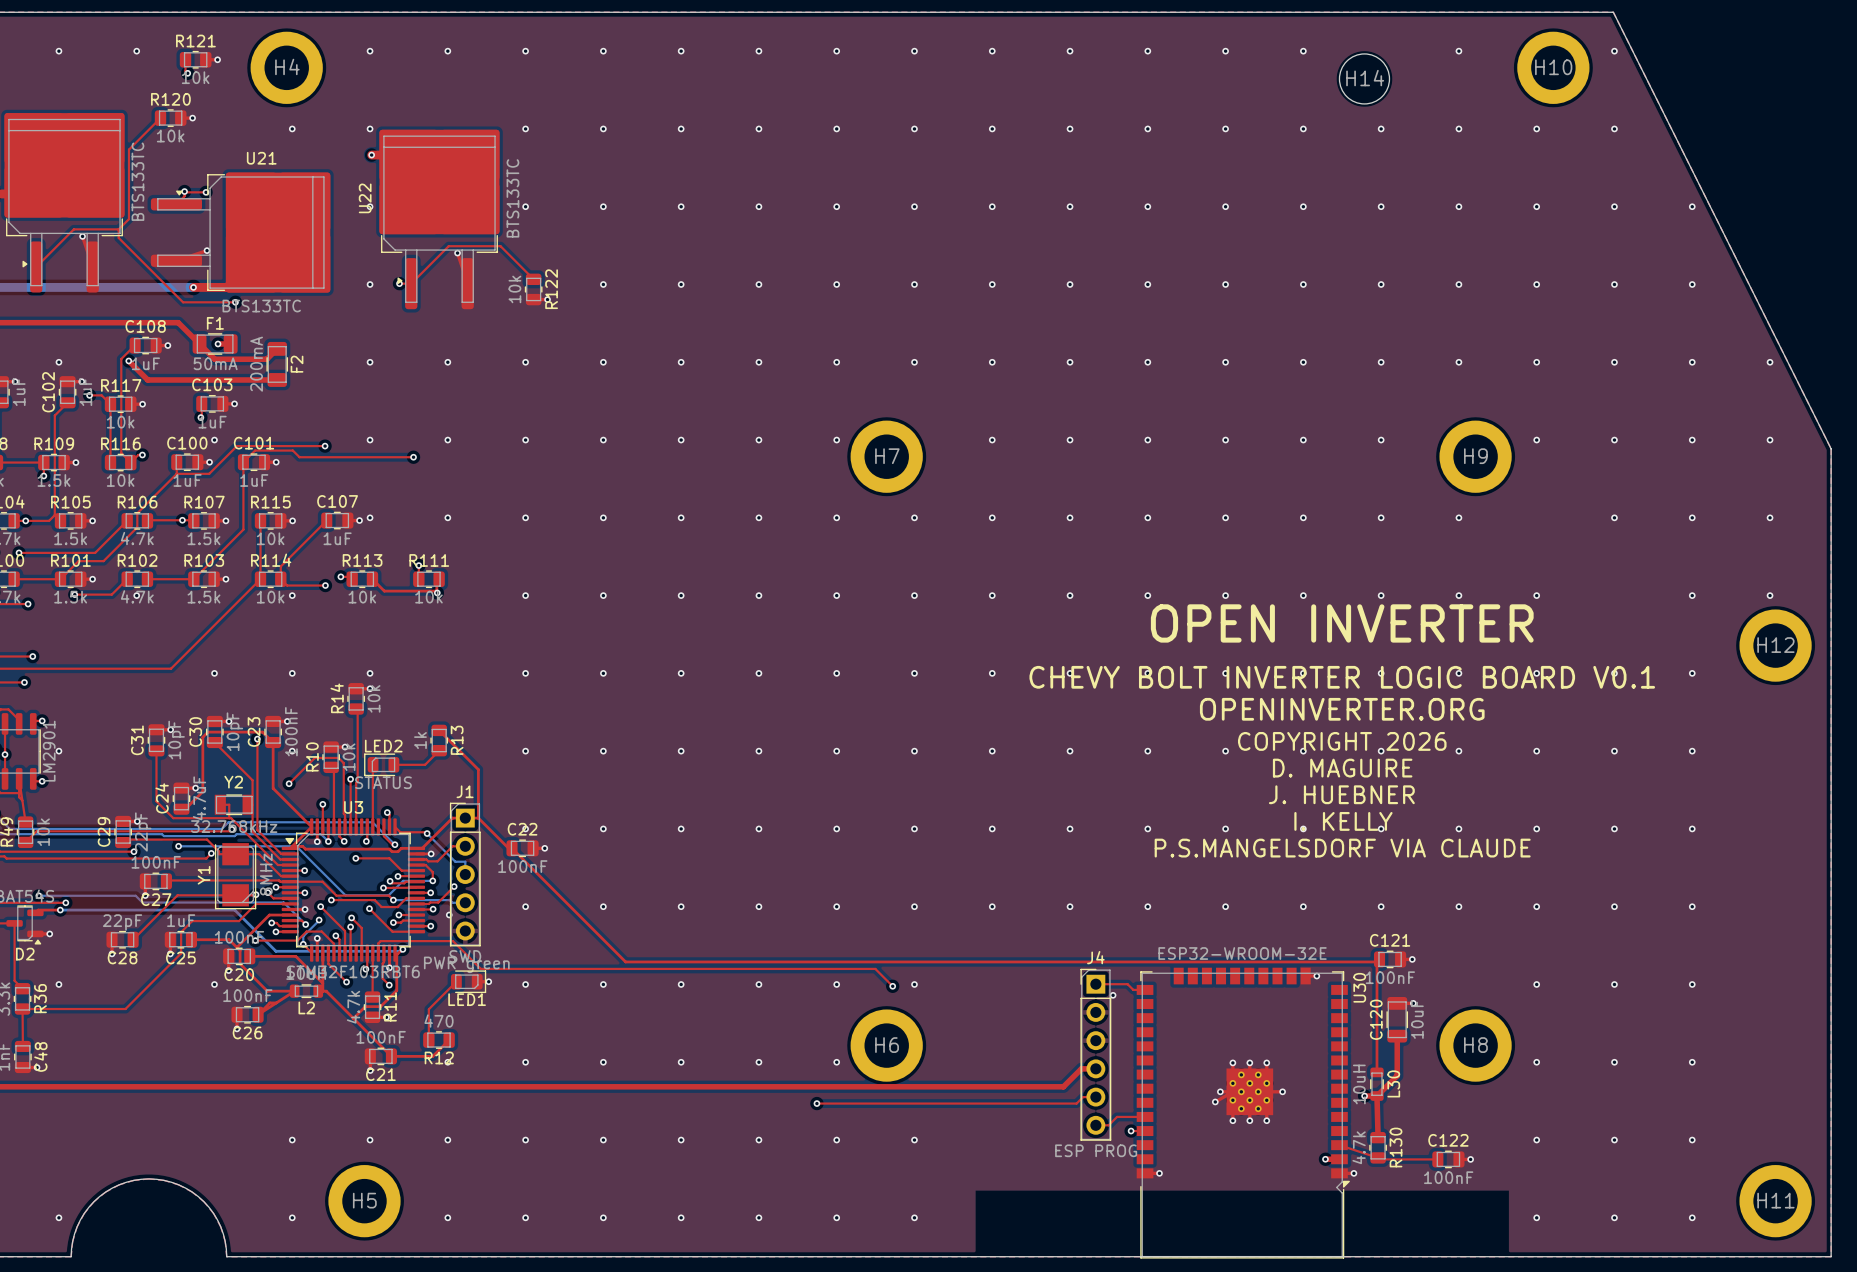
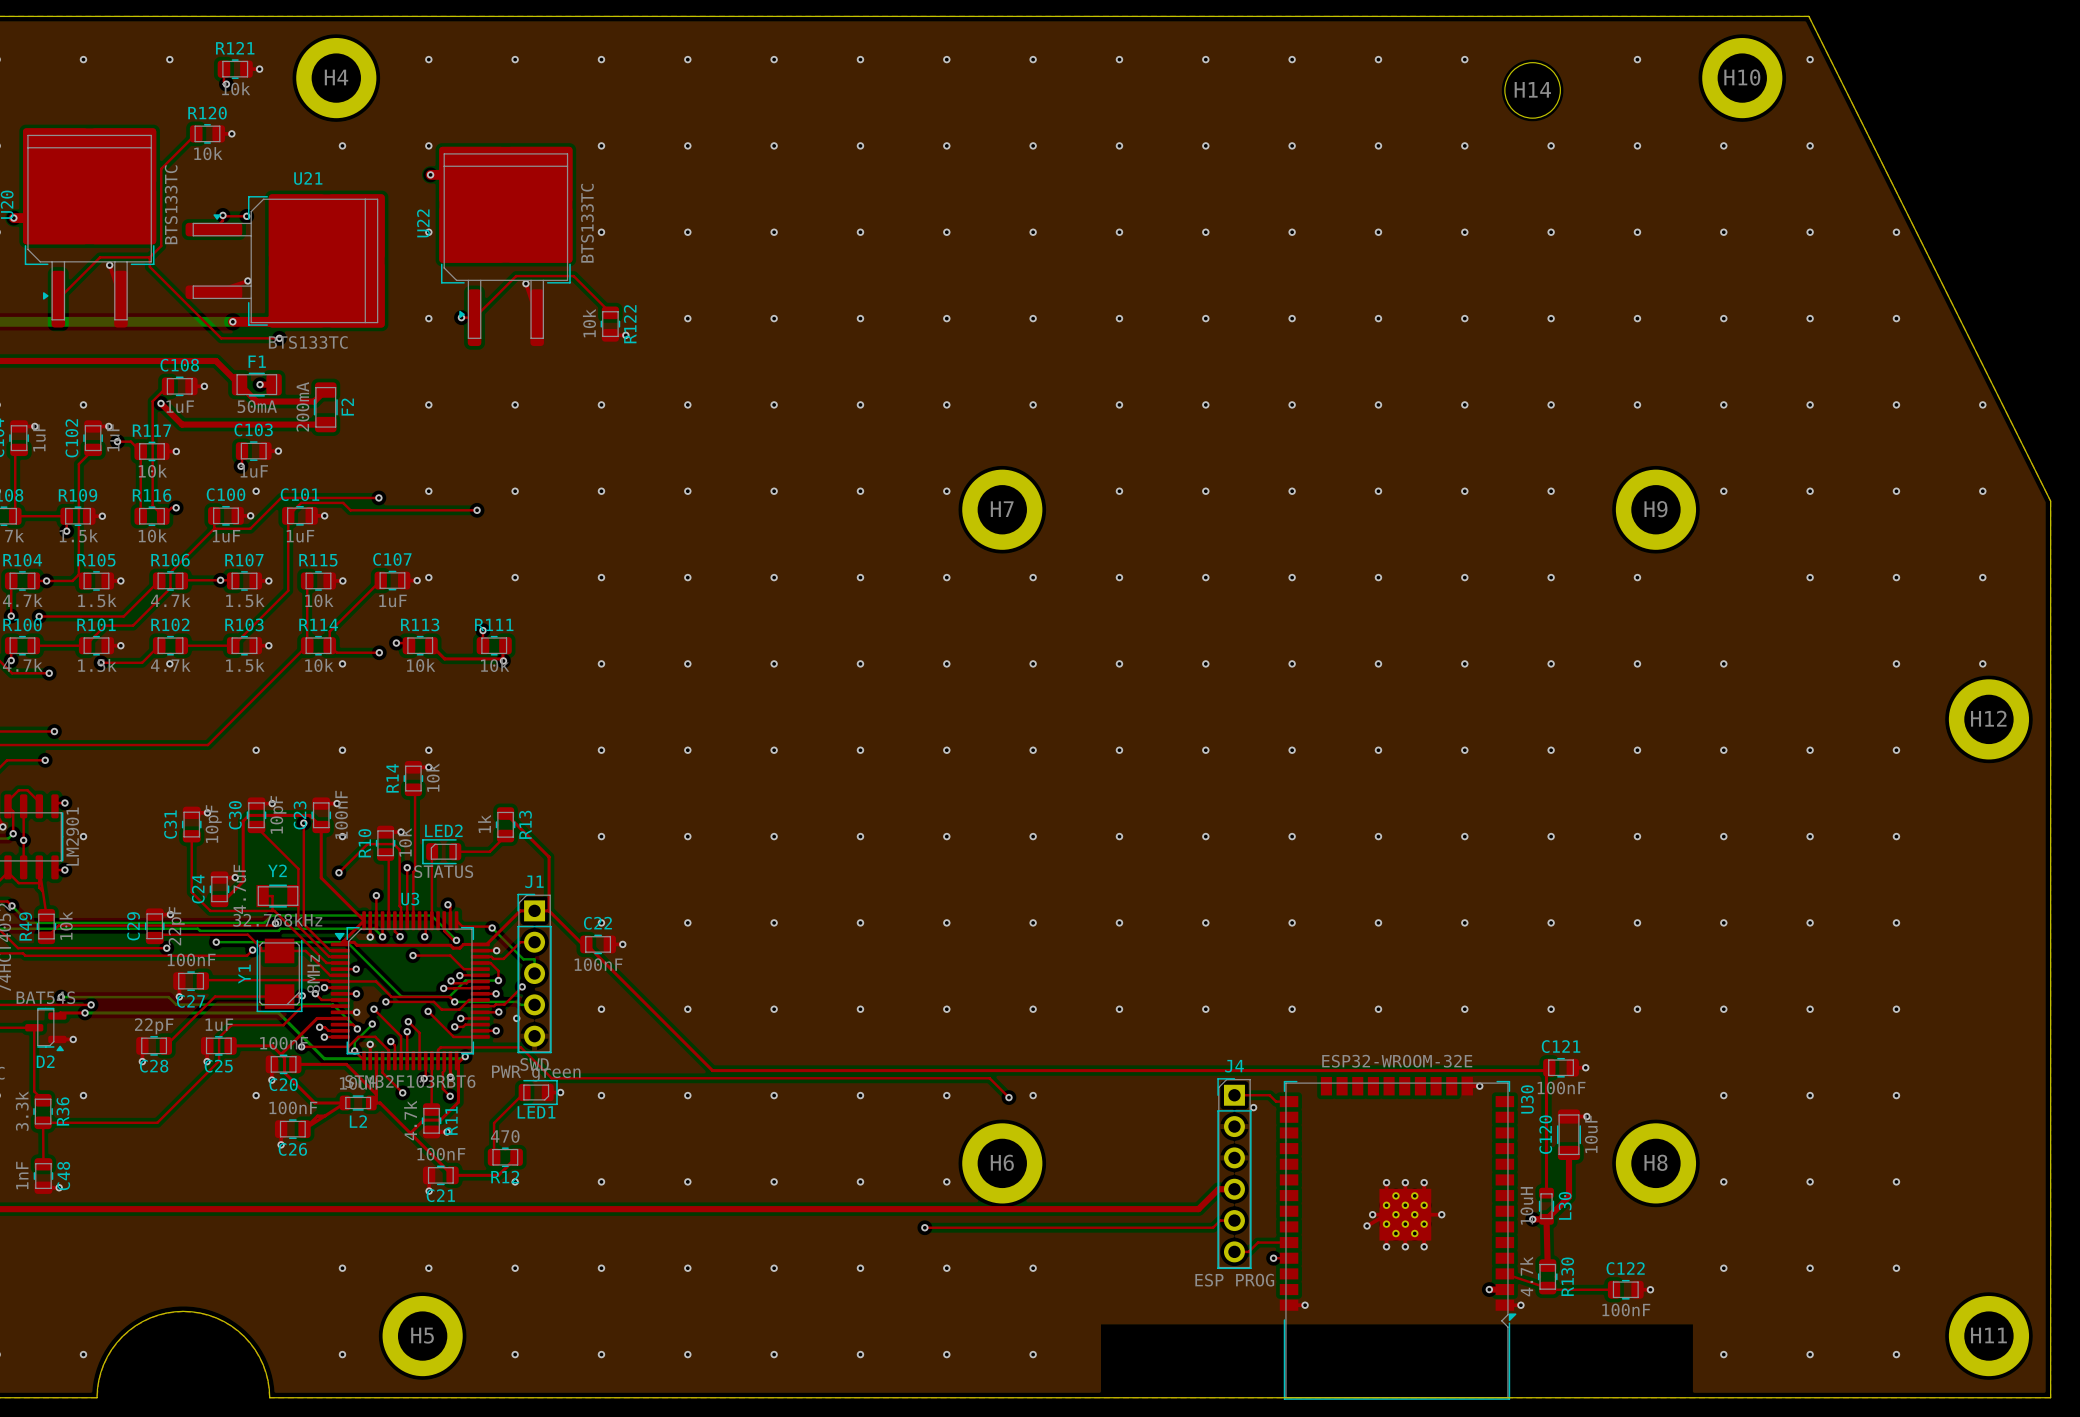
text: OPEN INVERTER (1342, 623) -> none
text: CHEVY BOLT INVERTER LOGIC BOARD V0.1 (1342, 677) -> none
text: OPENINVERTER.ORG (1342, 709) -> none
text: COPYRIGHT 2026 (1342, 741) -> none
text: D. MAGUIRE (1342, 768) -> none
text: J. HUEBNER (1341, 794) -> none
text: I. KELLY (1343, 821) -> none
text: P.S.MANGELSDORF VIA CLAUDE (1342, 848) -> none

